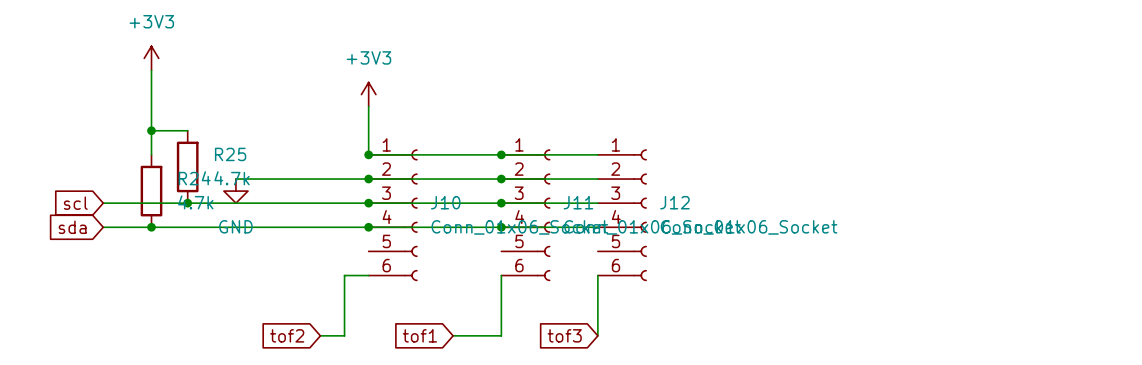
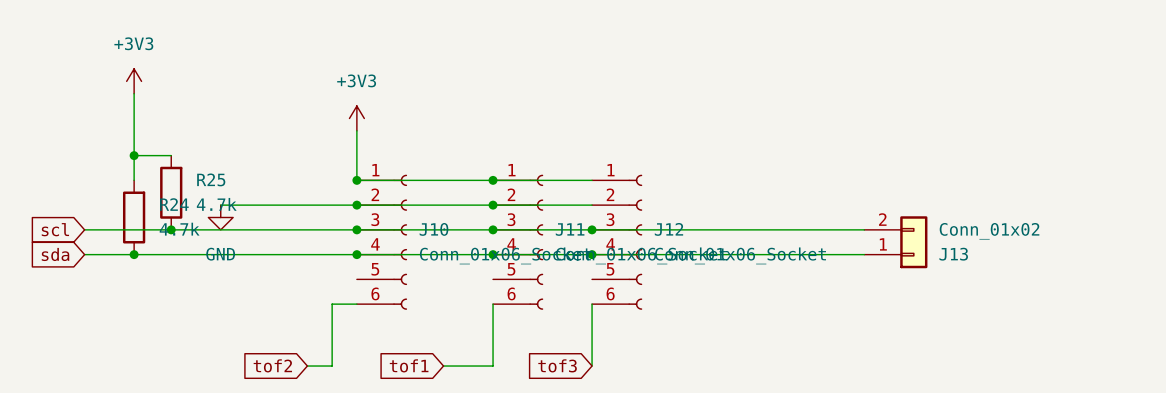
wire: none -> (592, 229) (864, 229)
junction: none -> (592, 229)
J13: none -> Conn_01x02 (895, 242)
wire: none -> (592, 254) (864, 254)
junction: none -> (592, 254)

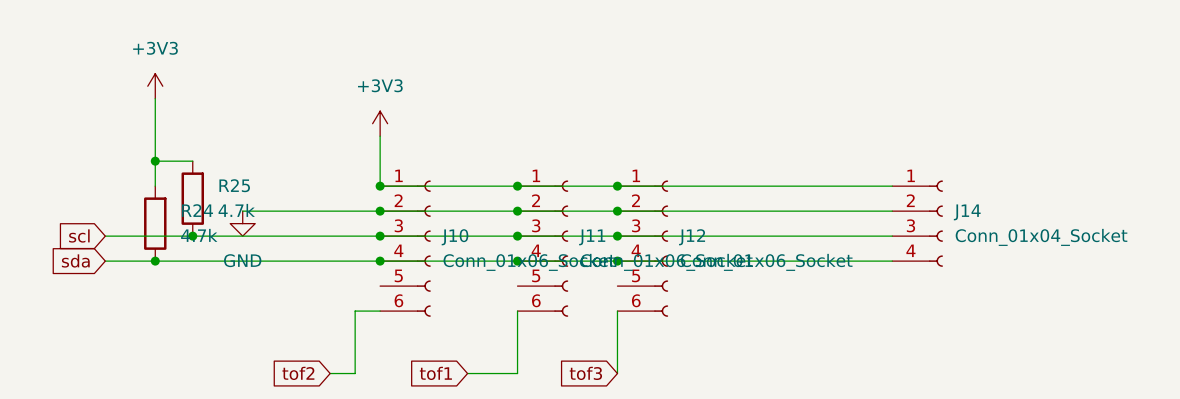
wire: none -> (617, 186) (892, 186)
junction: none -> (617, 186)
wire: none -> (617, 211) (892, 211)
junction: none -> (617, 211)
J14: none -> Conn_01x04_Socket (917, 223)
J13: Conn_01x02 (895, 242) -> none

